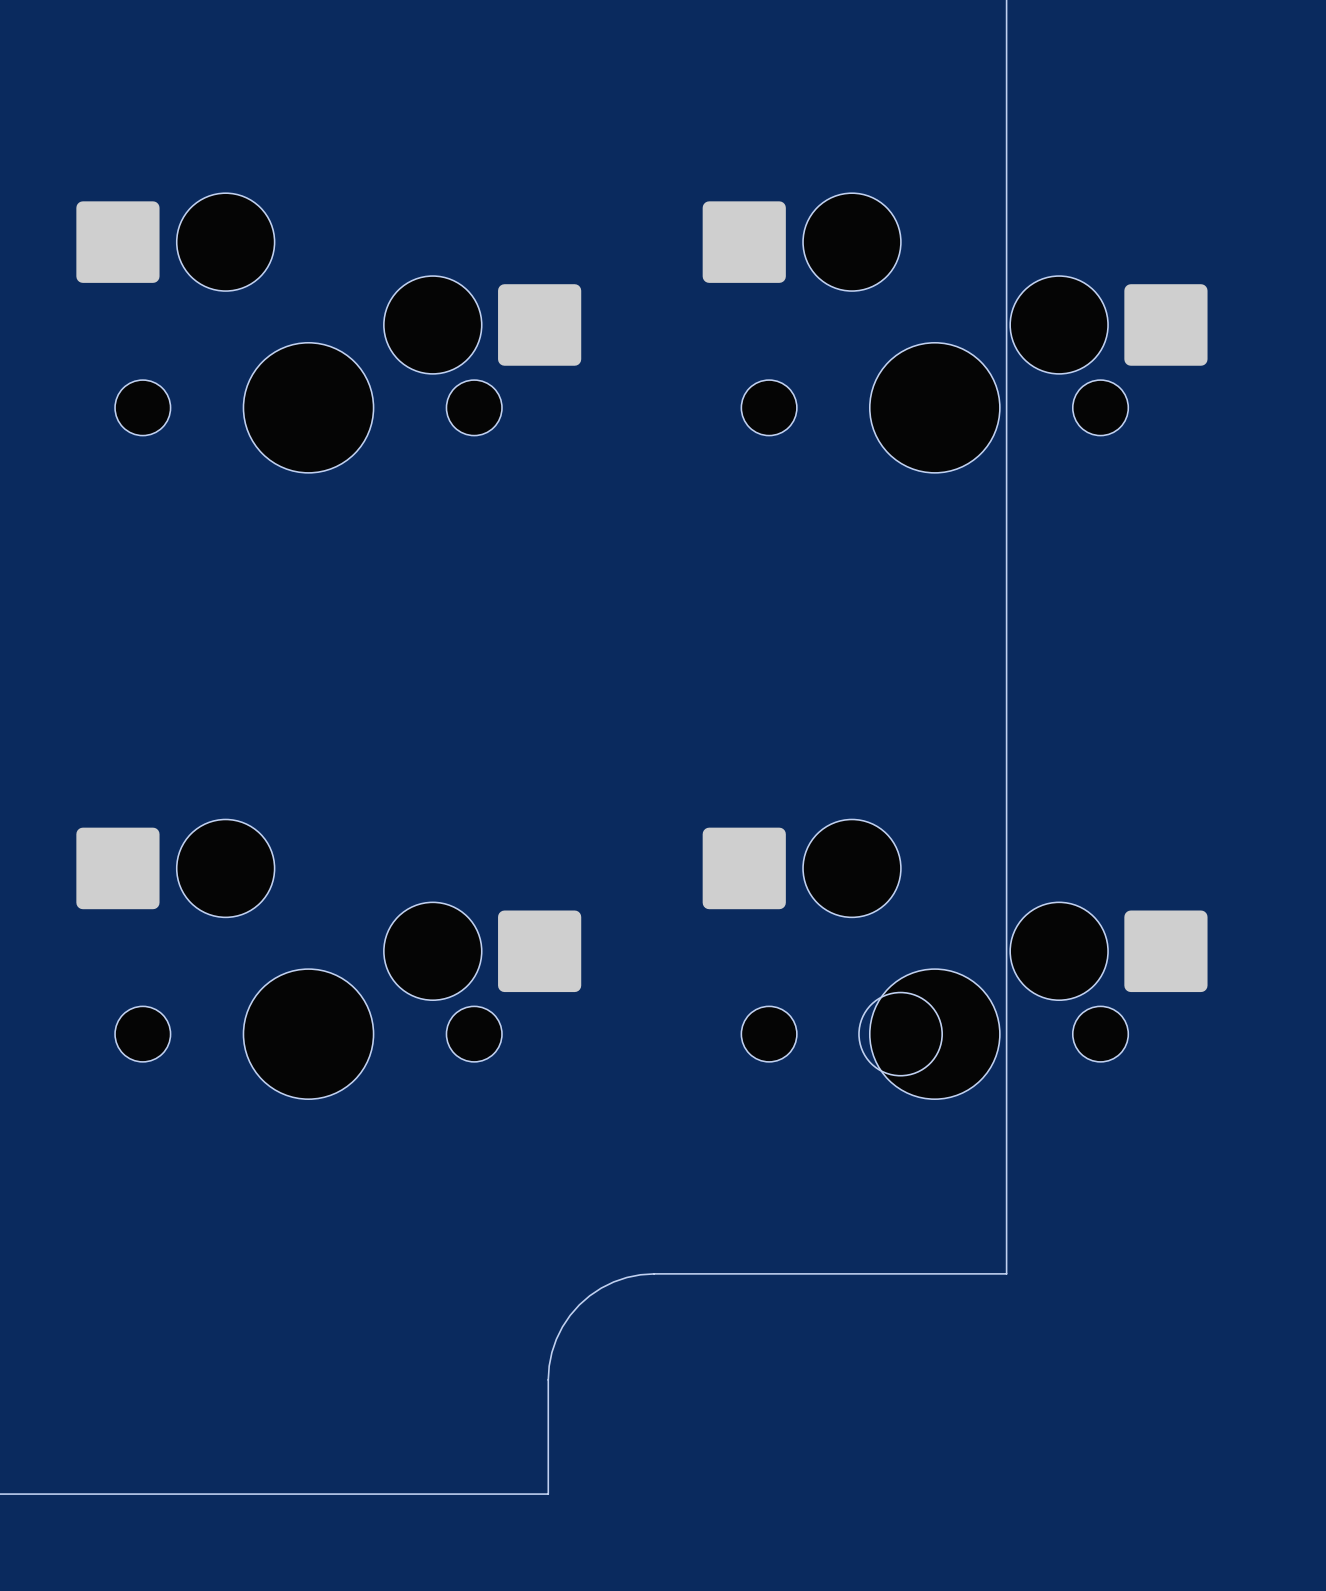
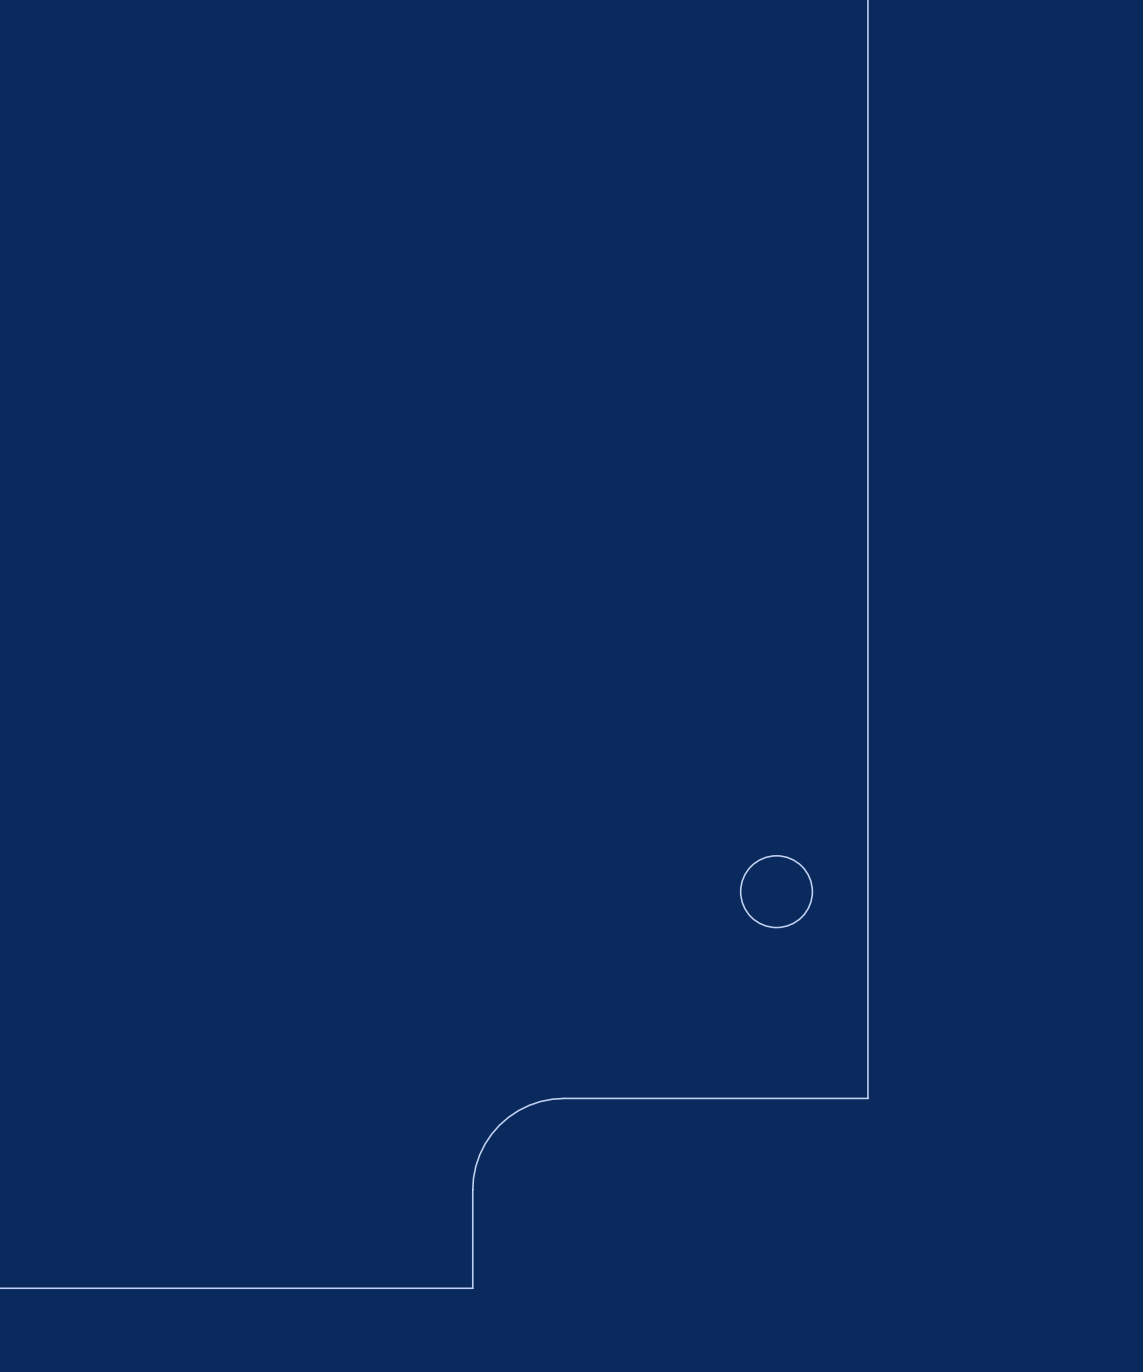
part: (328, 333) -> none
part: (955, 333) -> none
part: (328, 959) -> none
part: (955, 959) -> none

